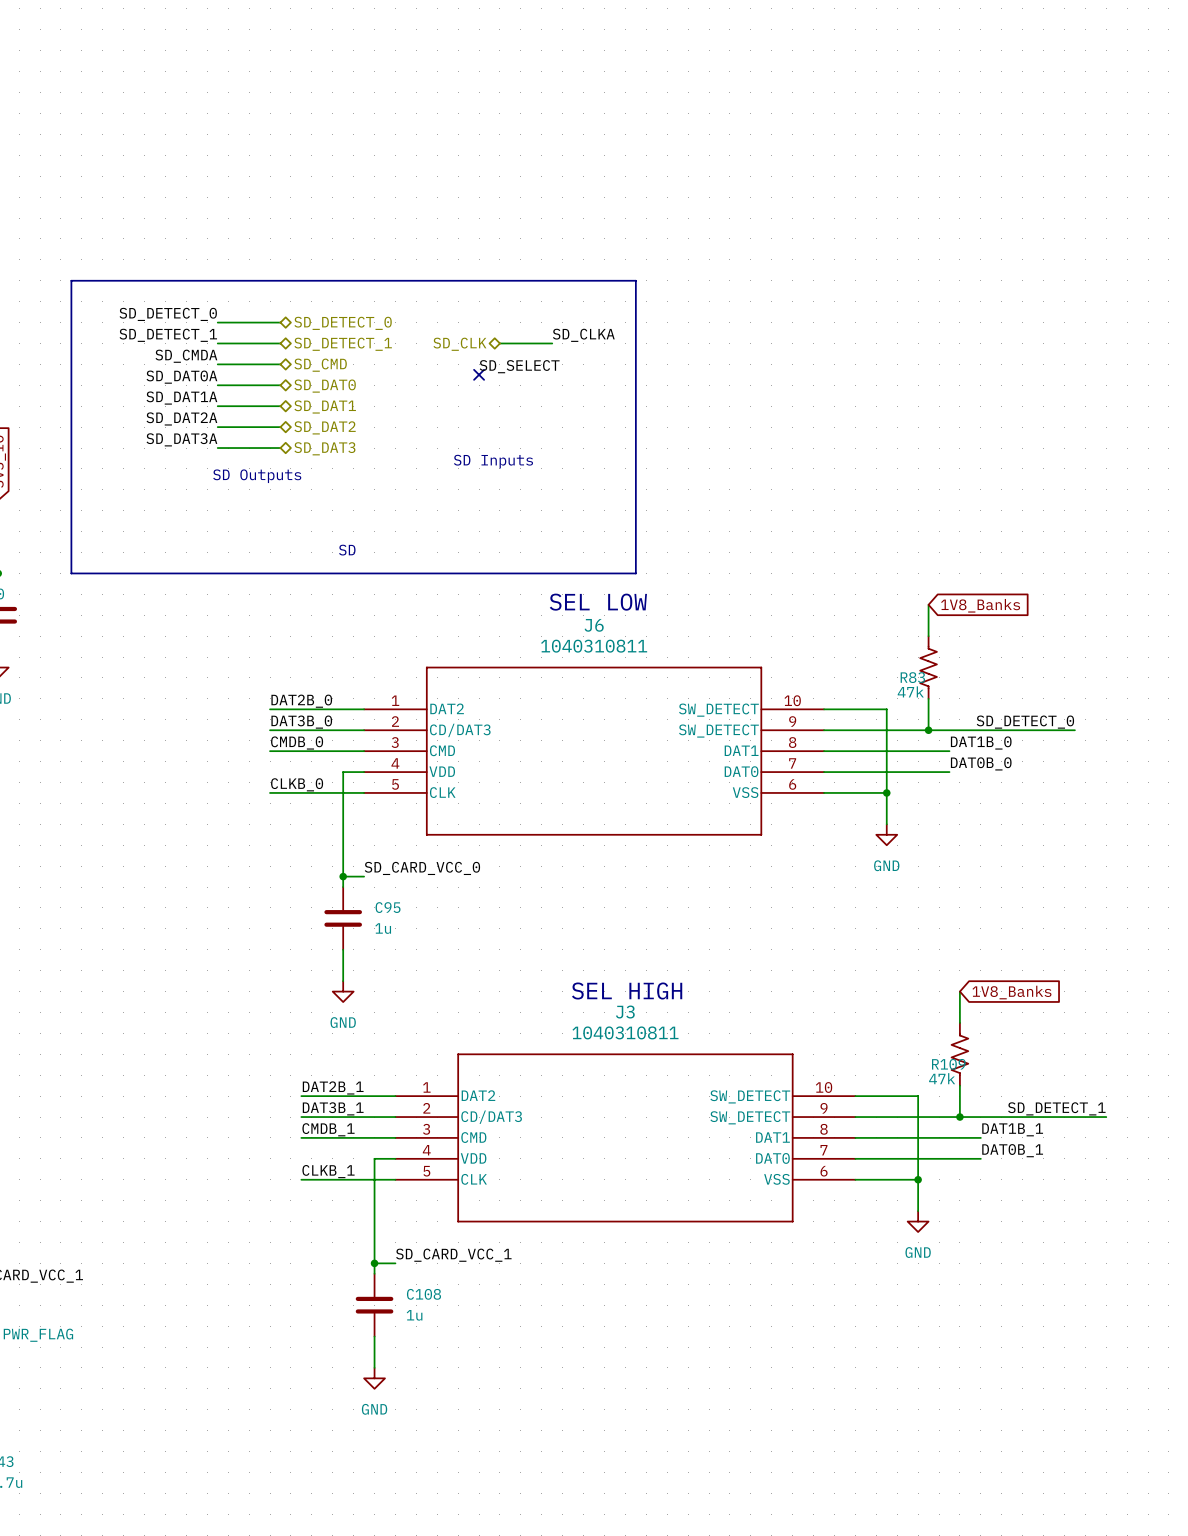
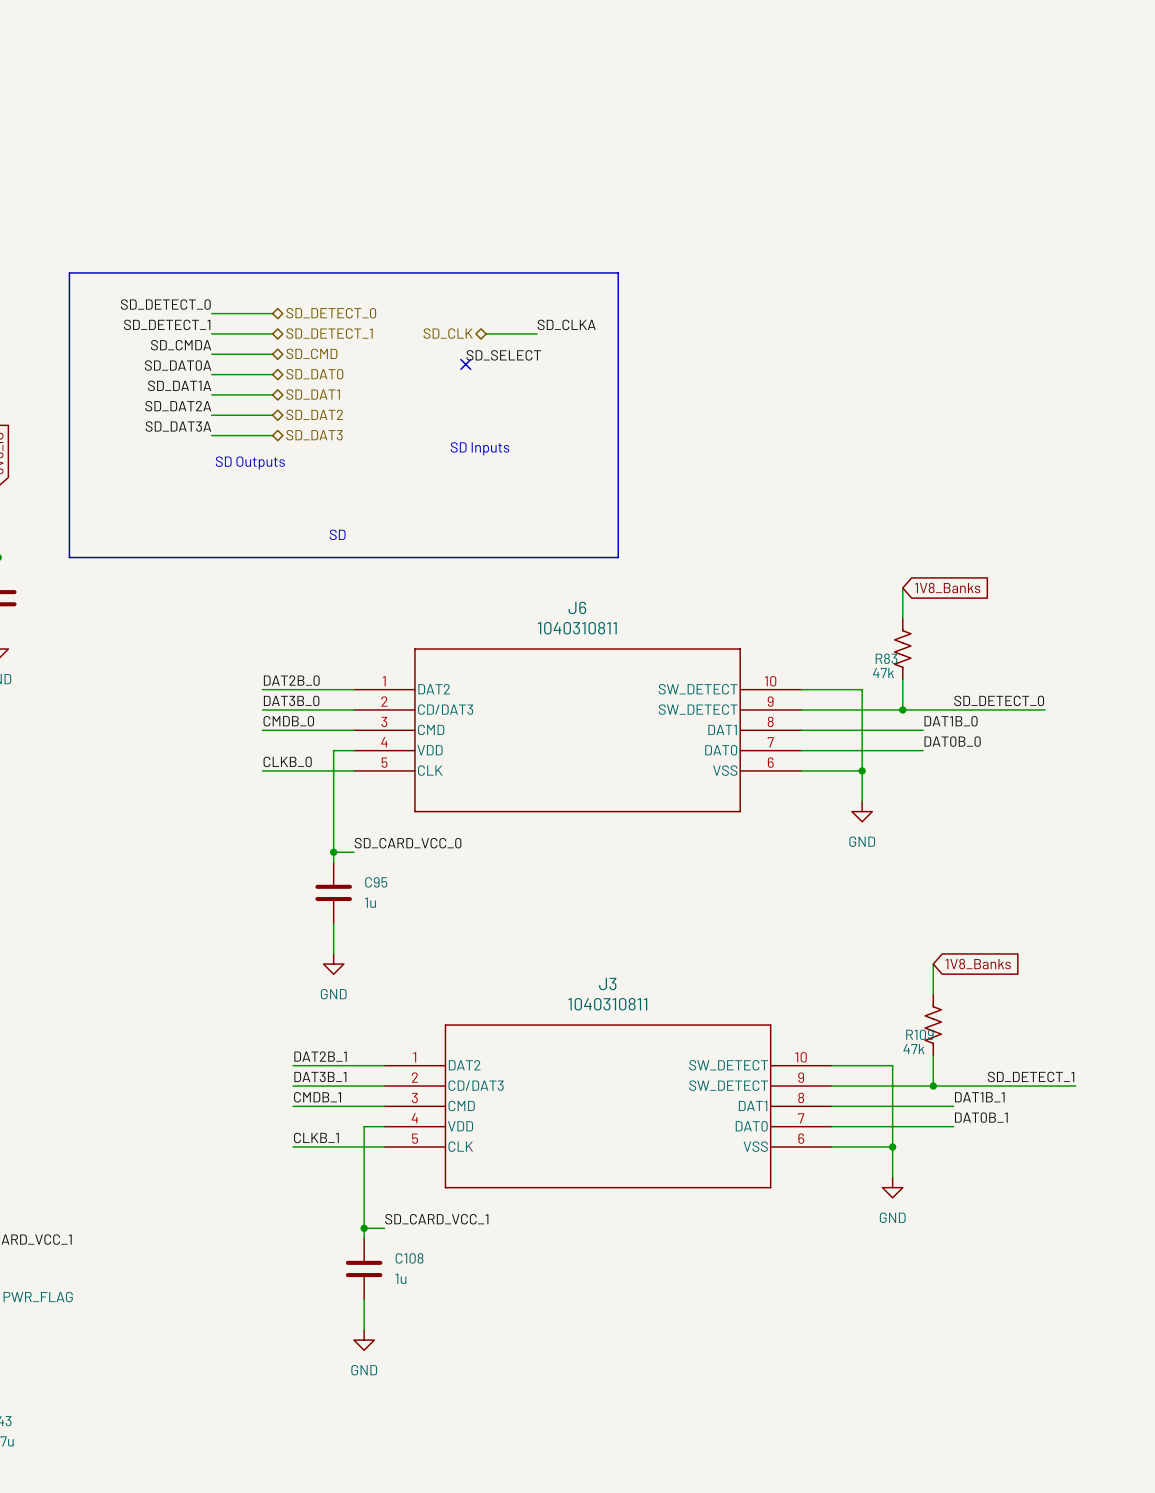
text: SEL LOW (598, 602) -> none
text: SEL HIGH (627, 991) -> none

